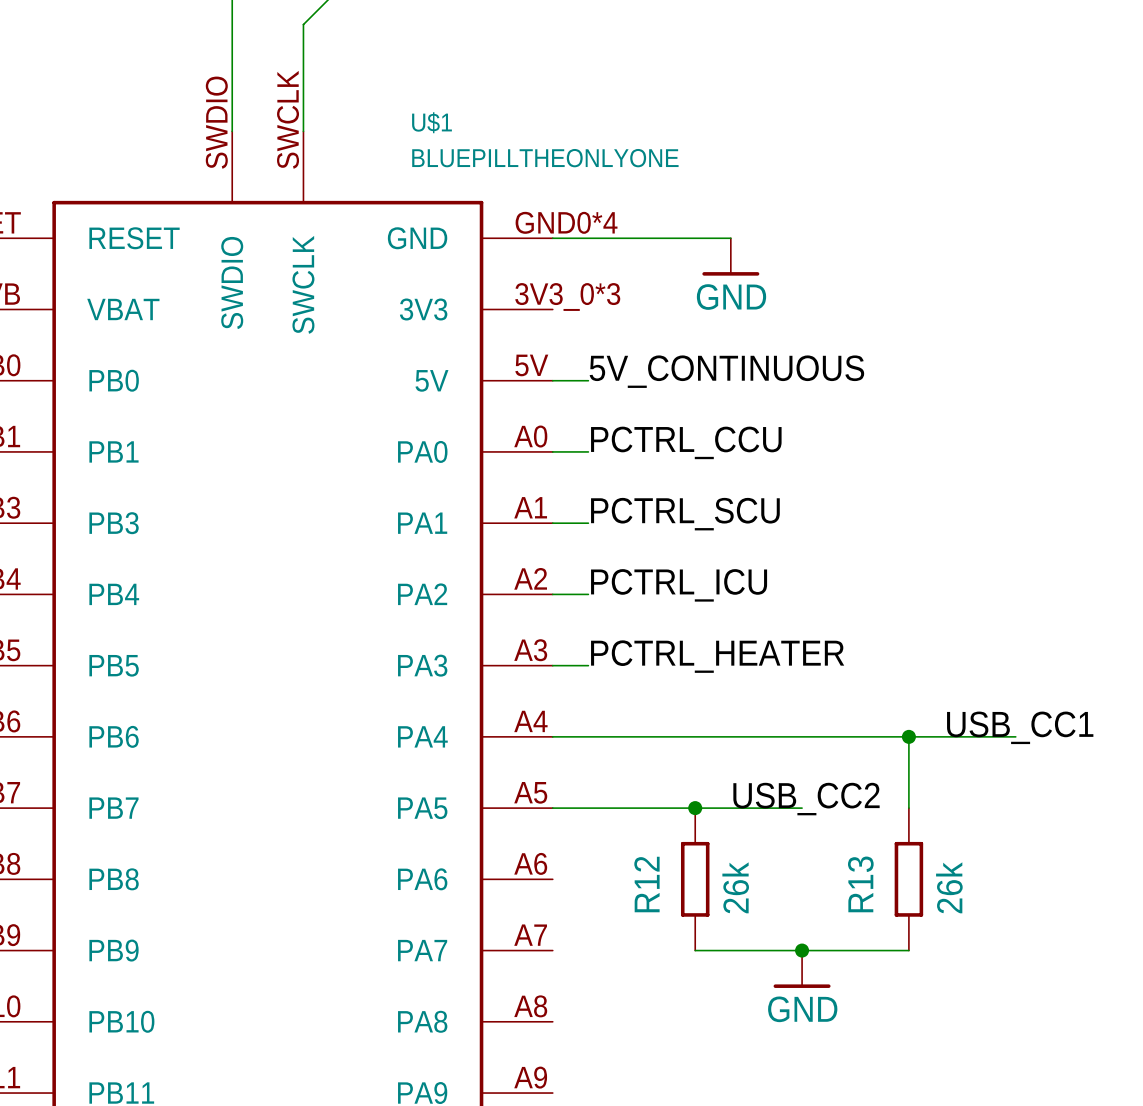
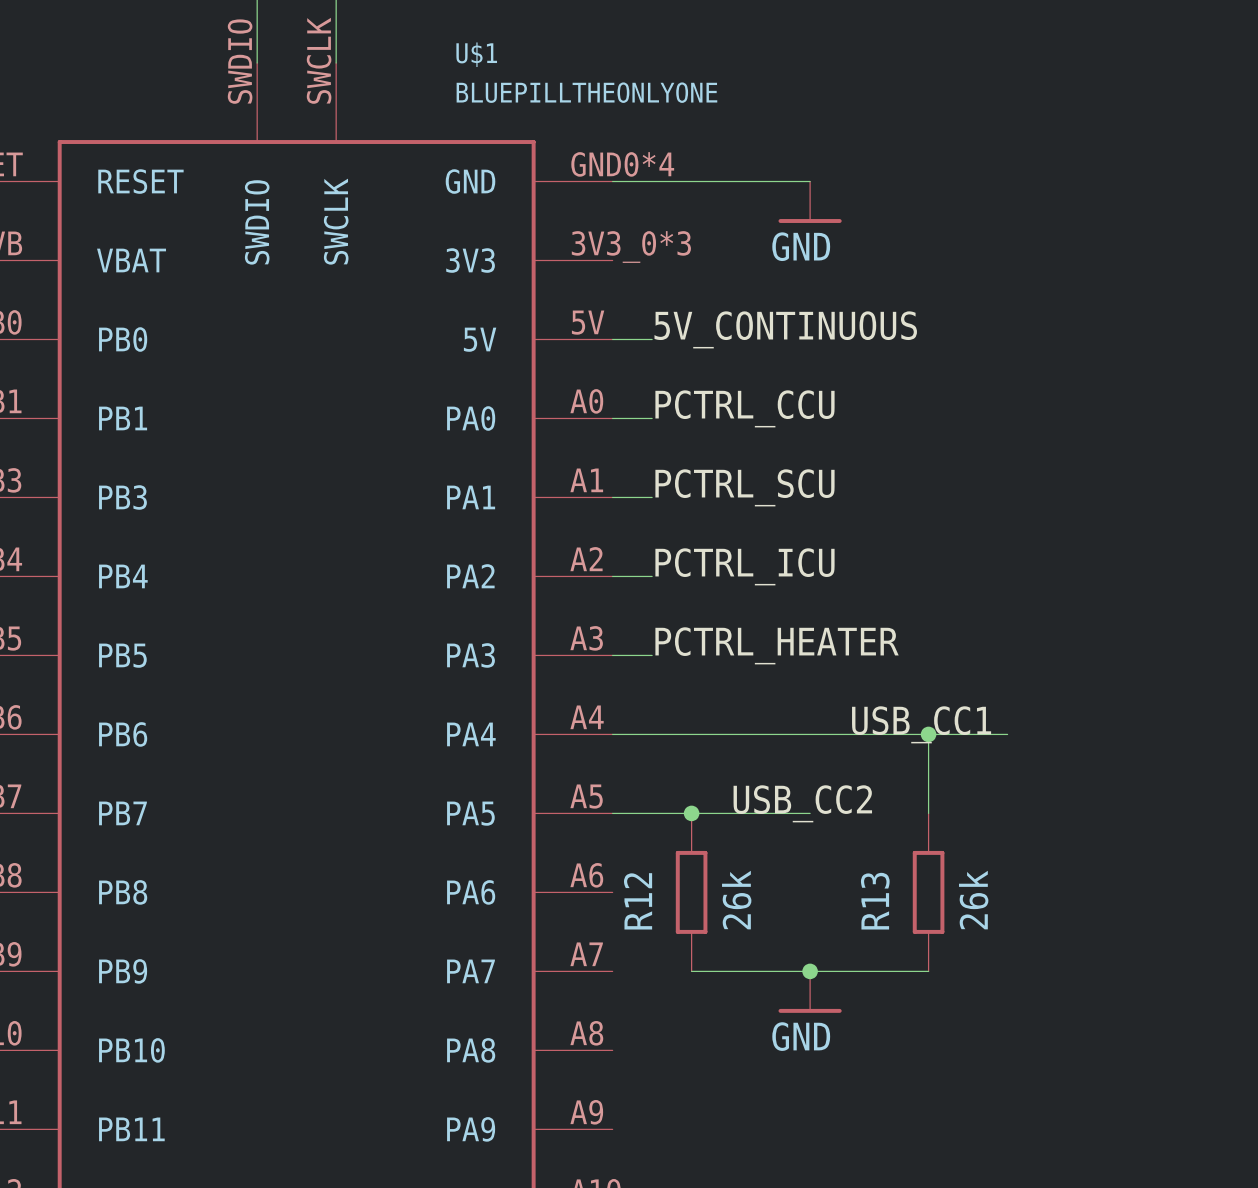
label position: USB_CC1 (1020, 727) -> USB_CC1 (921, 724)
wire: none -> (928, 734) (928, 813)
junction position: (908, 736) -> (928, 734)
wire: (1015, 736) (908, 736) (908, 808) -> none
label position: USB_CC2 (806, 799) -> USB_CC2 (802, 803)
junction position: (695, 808) -> (691, 813)
wire: (730, 808) (802, 808) -> (691, 971) (770, 971)
R12 position: (695, 879) -> (691, 892)
R13 position: (908, 879) -> (928, 892)
junction position: (802, 950) -> (810, 971)
wire: (837, 950) (908, 950) -> none
power symbol position: GND (802, 969) -> GND (810, 992)

